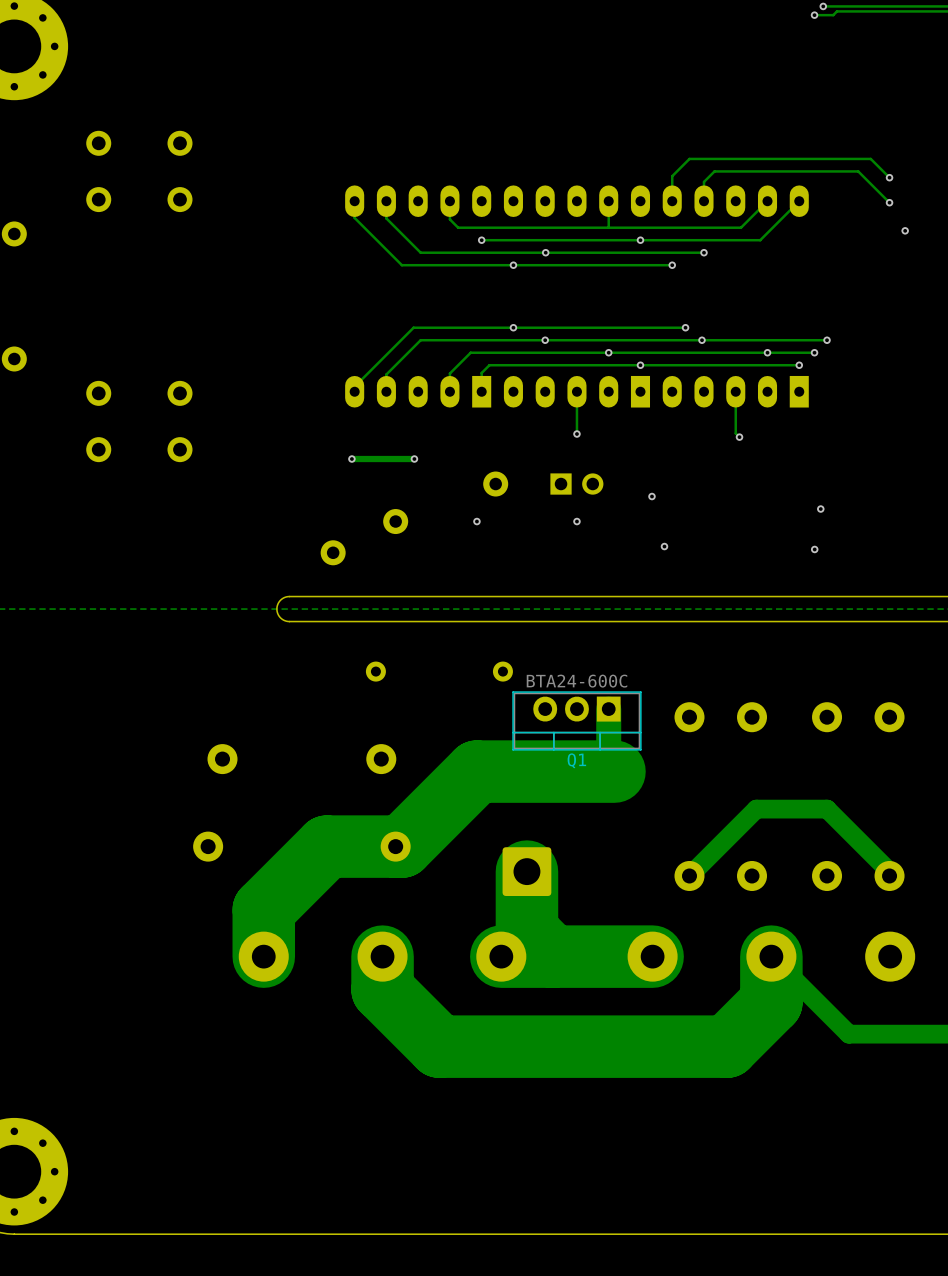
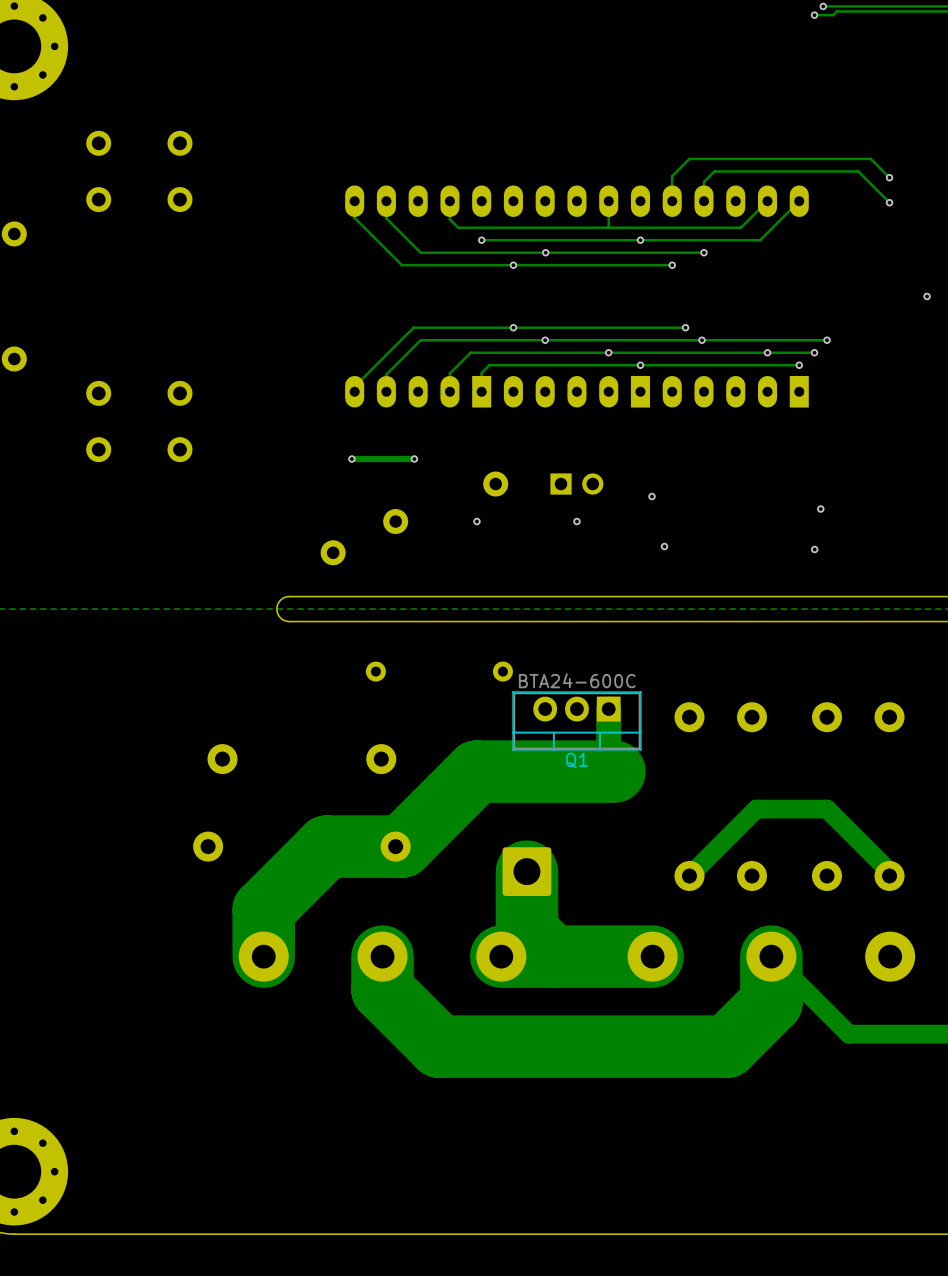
via position: (905, 230) -> (927, 296)
track: (576, 391) (576, 434) -> none
track: (735, 391) (735, 433) (739, 437) -> none
via: (576, 434) -> none
via: (739, 437) -> none

